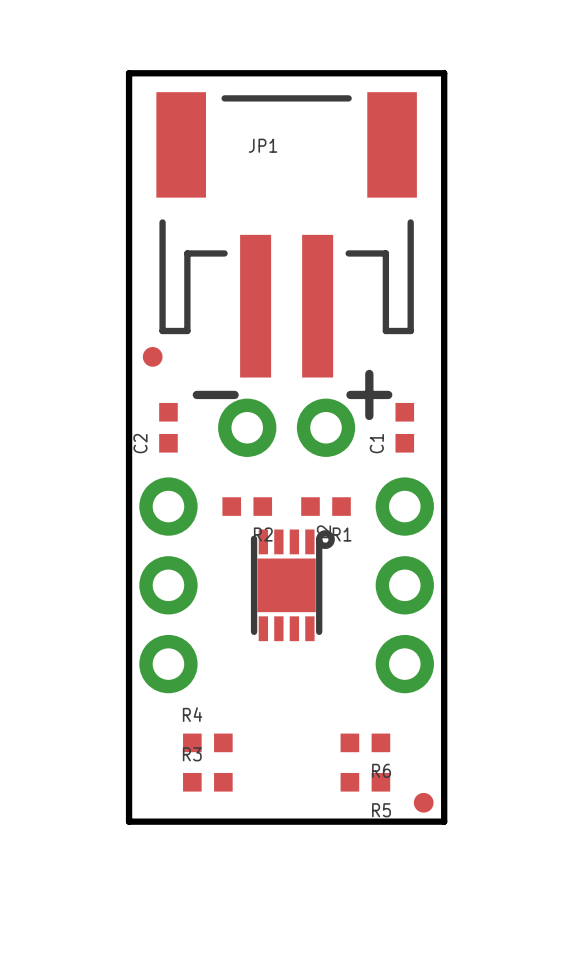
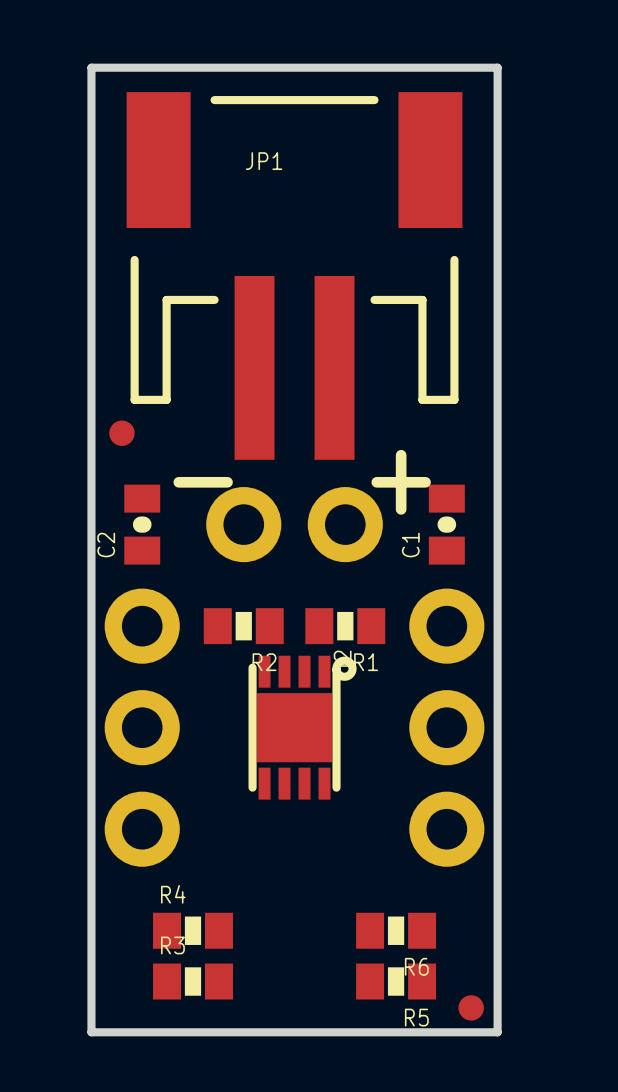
C2 footprint: [159, 402, 178, 453] -> [124, 484, 161, 565]
C1 footprint: [395, 402, 415, 453] -> [428, 484, 465, 565]
R2 footprint: [222, 497, 273, 516] -> [203, 608, 284, 645]
R1 footprint: [301, 497, 351, 516] -> [305, 608, 386, 645]
R4 footprint: [183, 733, 233, 753] -> [153, 912, 233, 949]
R6 footprint: [340, 733, 391, 753] -> [356, 912, 437, 949]
R3 footprint: [183, 772, 233, 792] -> [153, 963, 233, 1000]
R5 footprint: [340, 772, 391, 792] -> [356, 963, 437, 1000]

